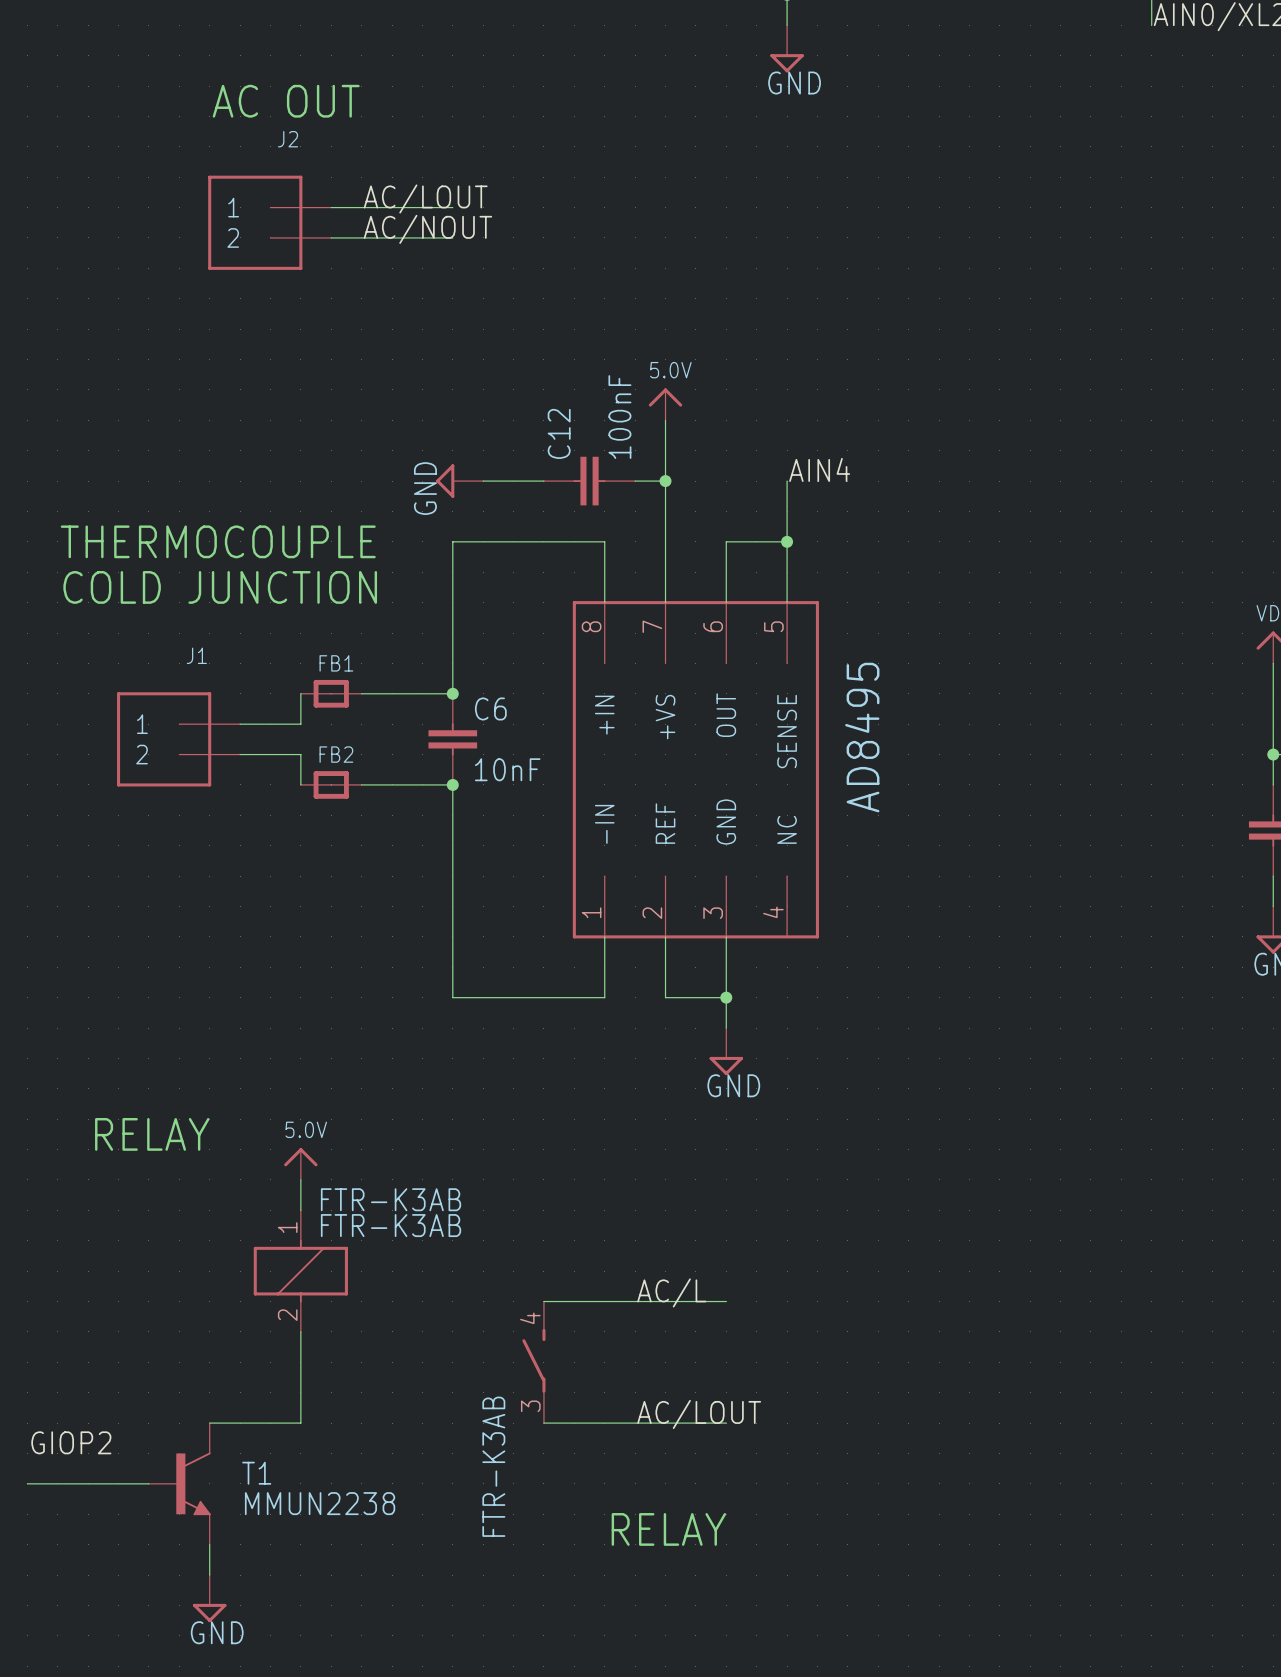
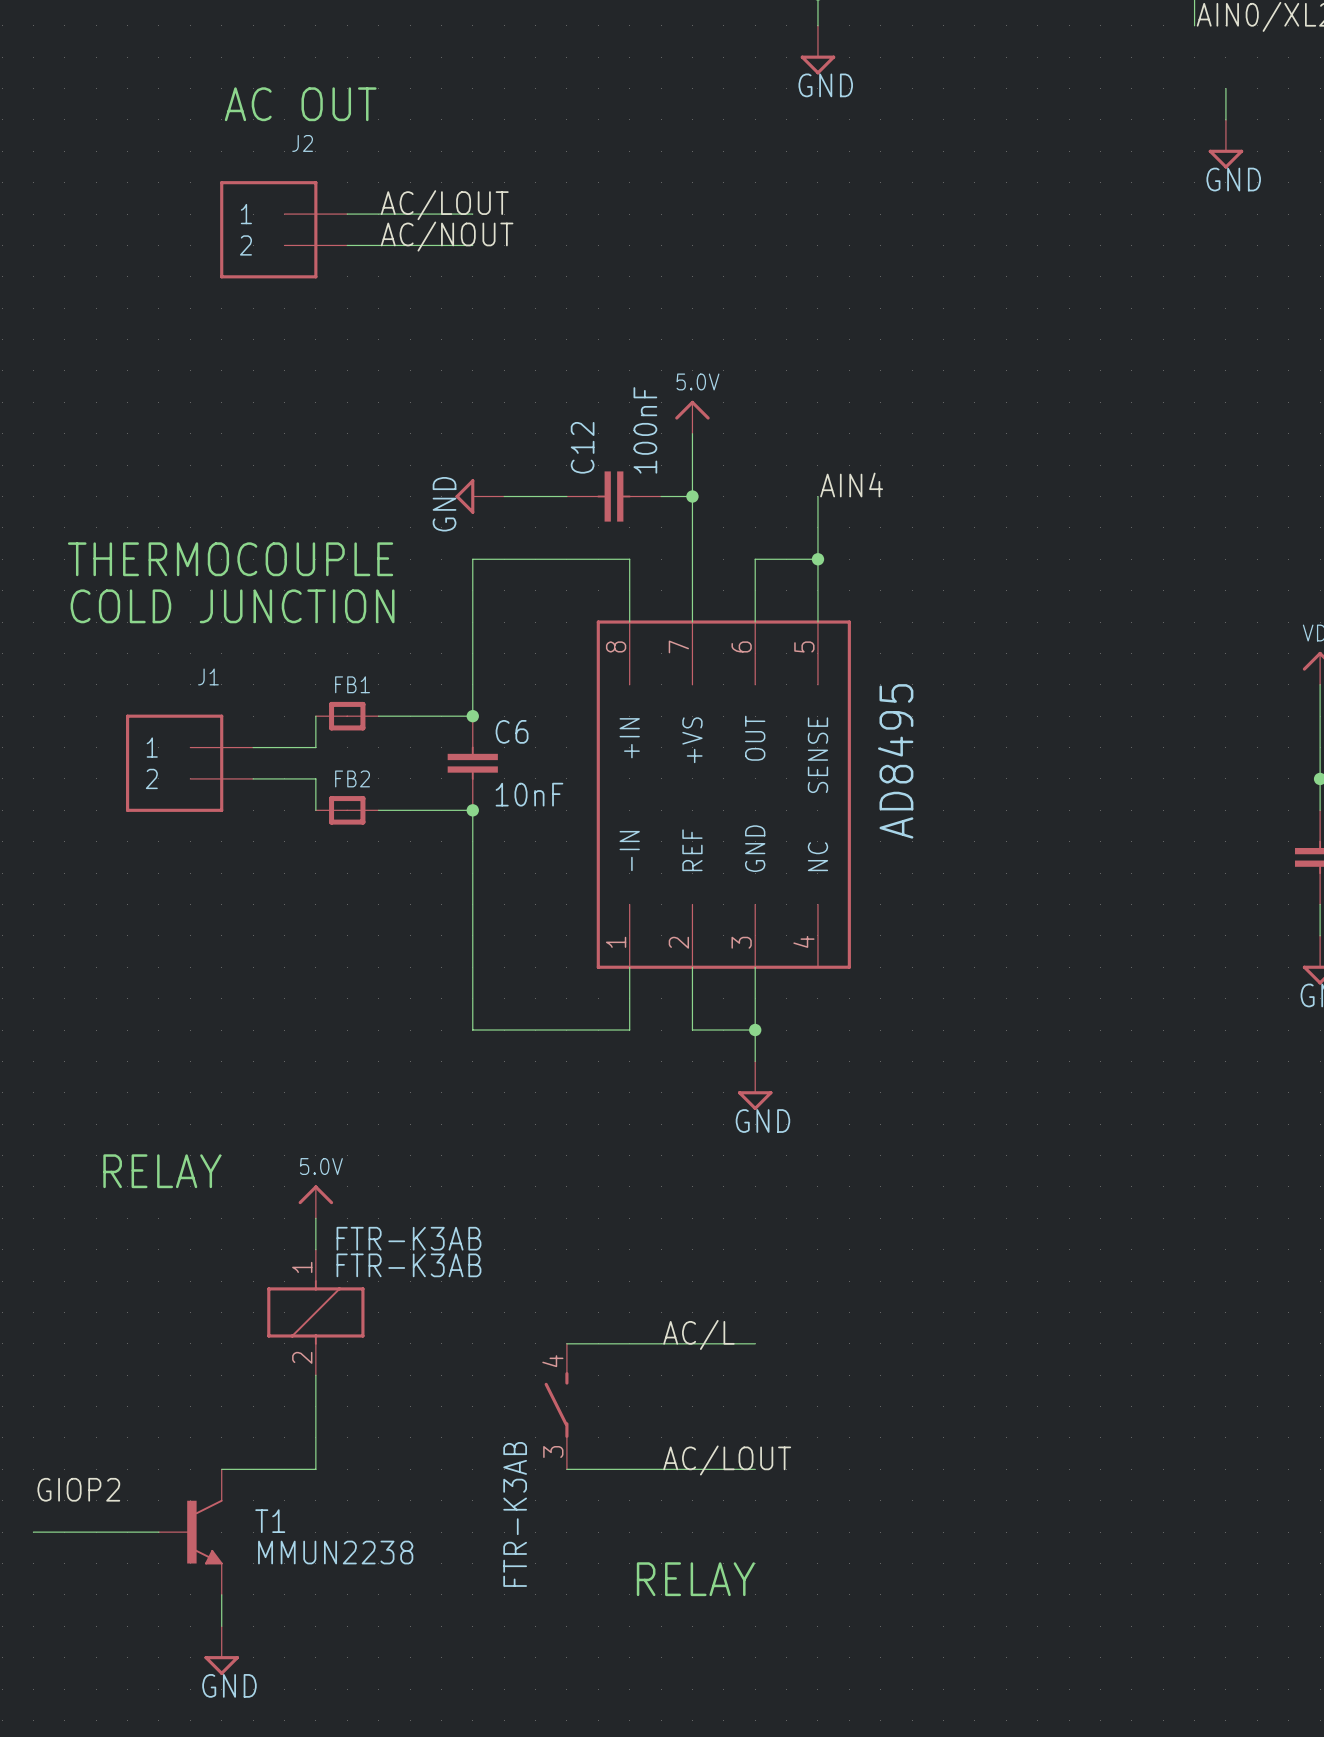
wire: none -> (1225, 88) (1225, 119)
power symbol: none -> GND (1225, 144)

